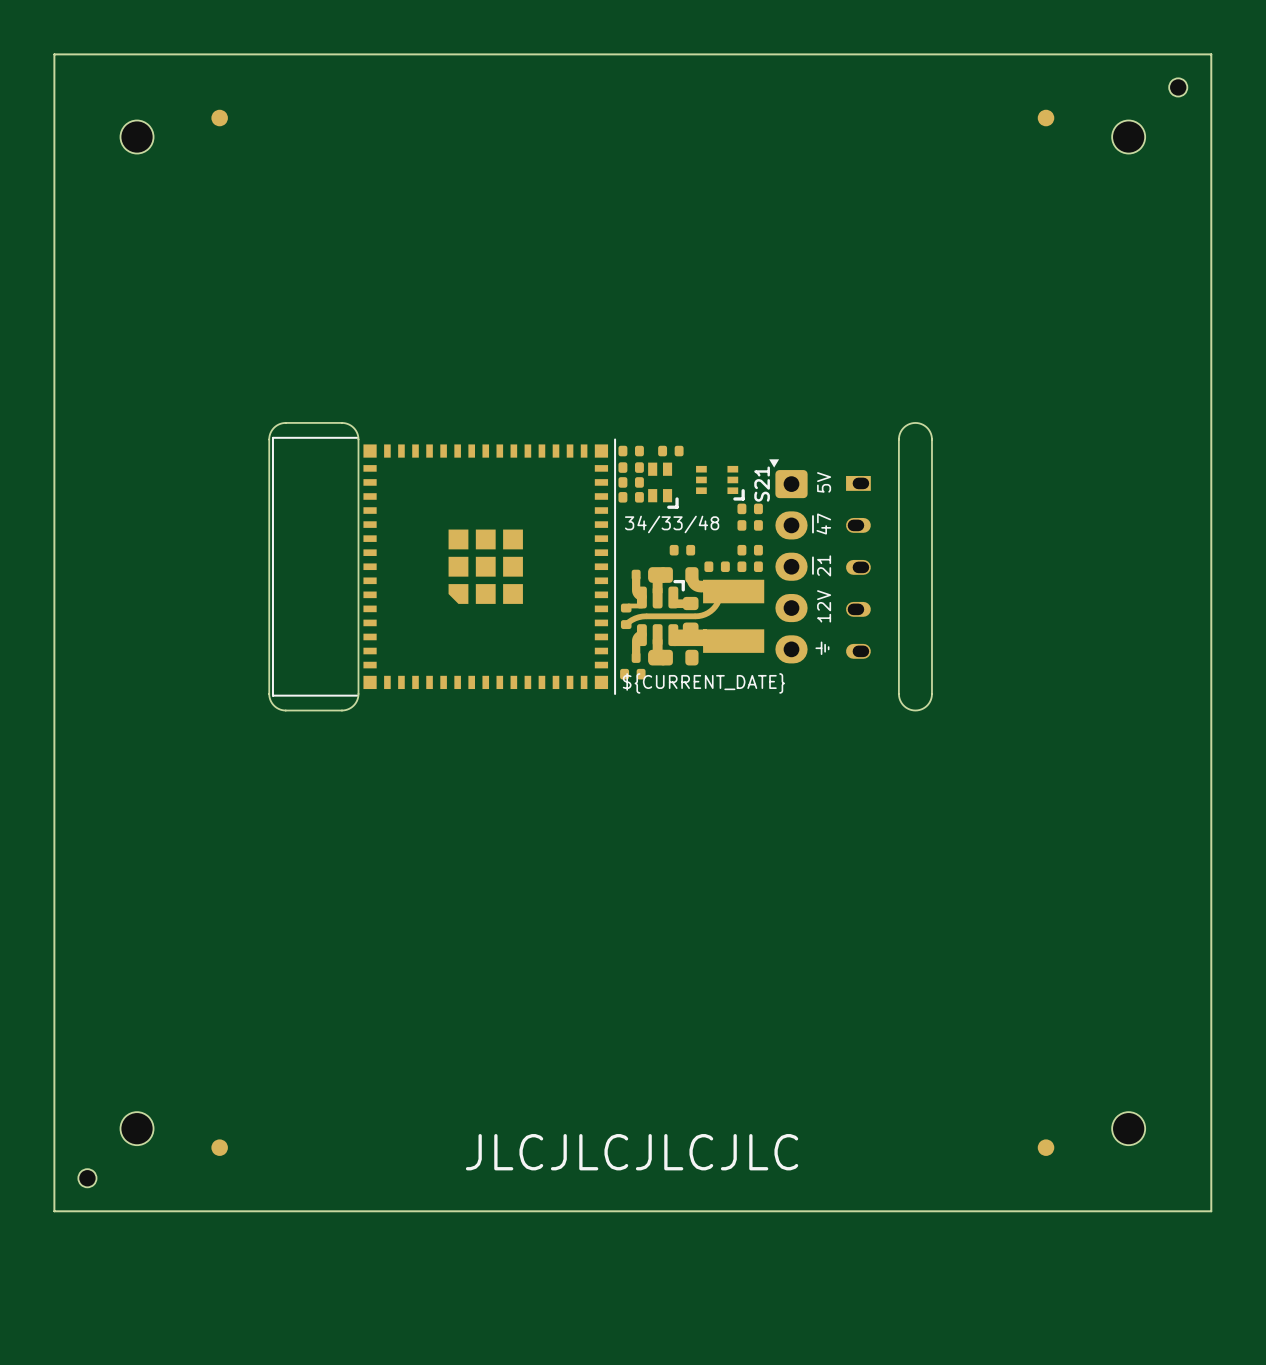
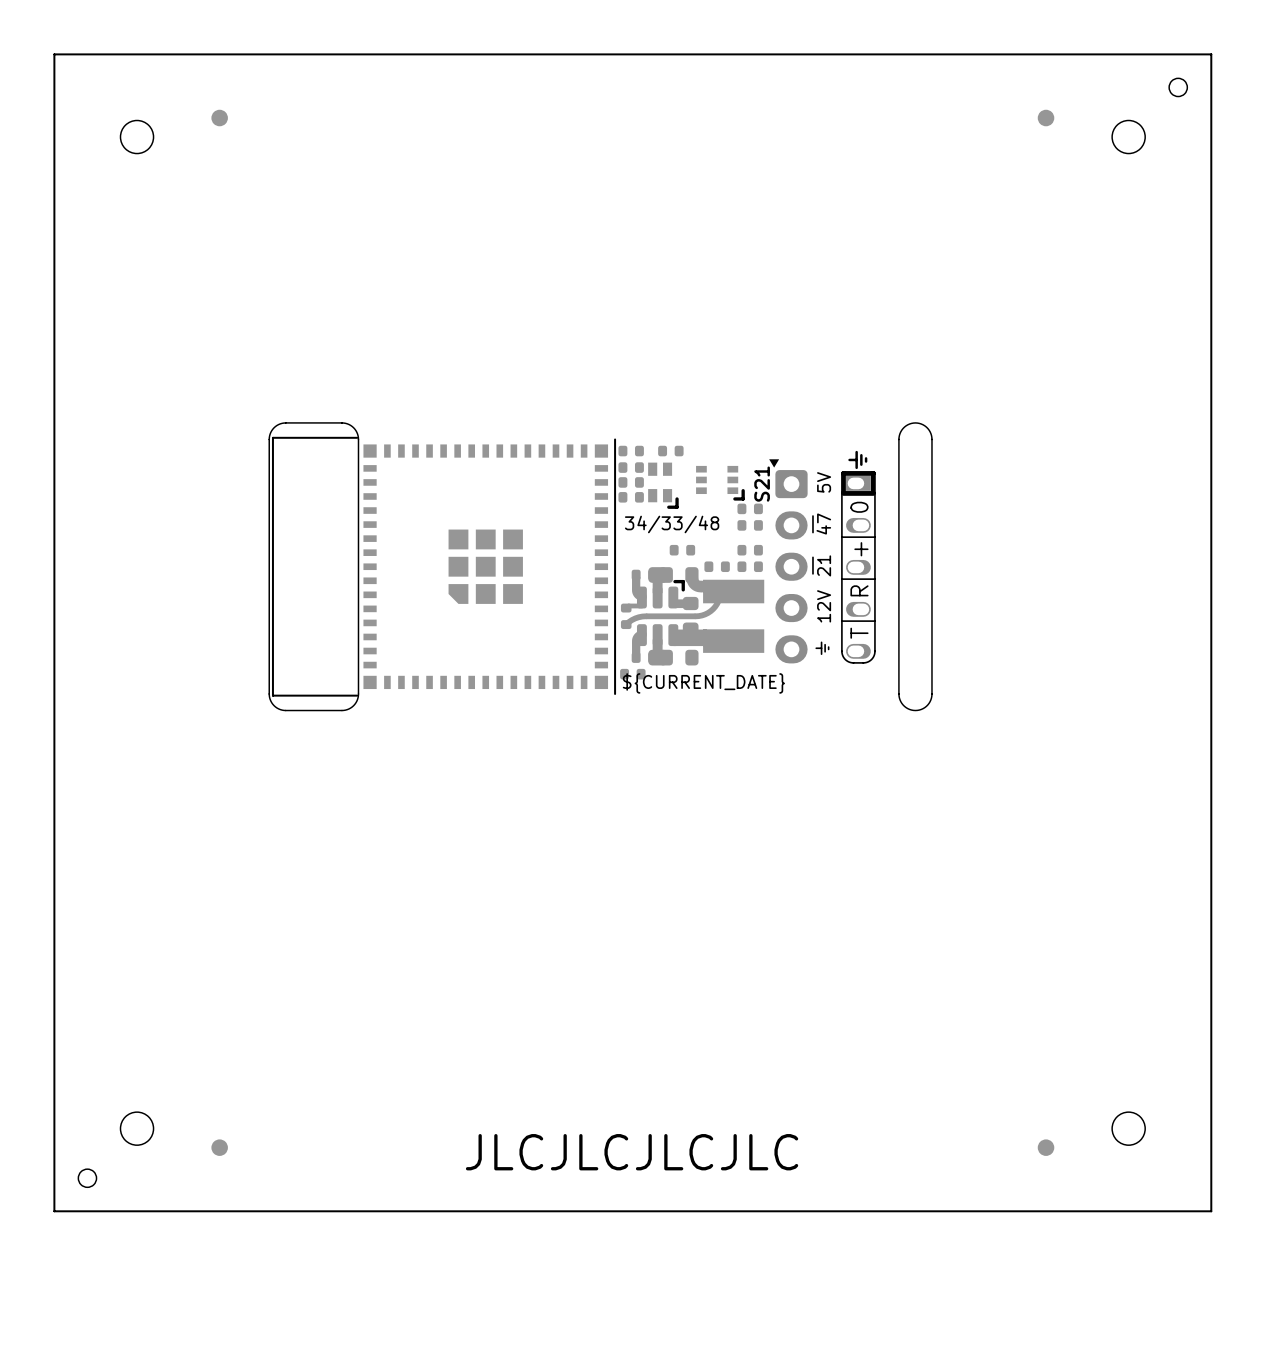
part side: bottom (858, 567) -> top (858, 567)

